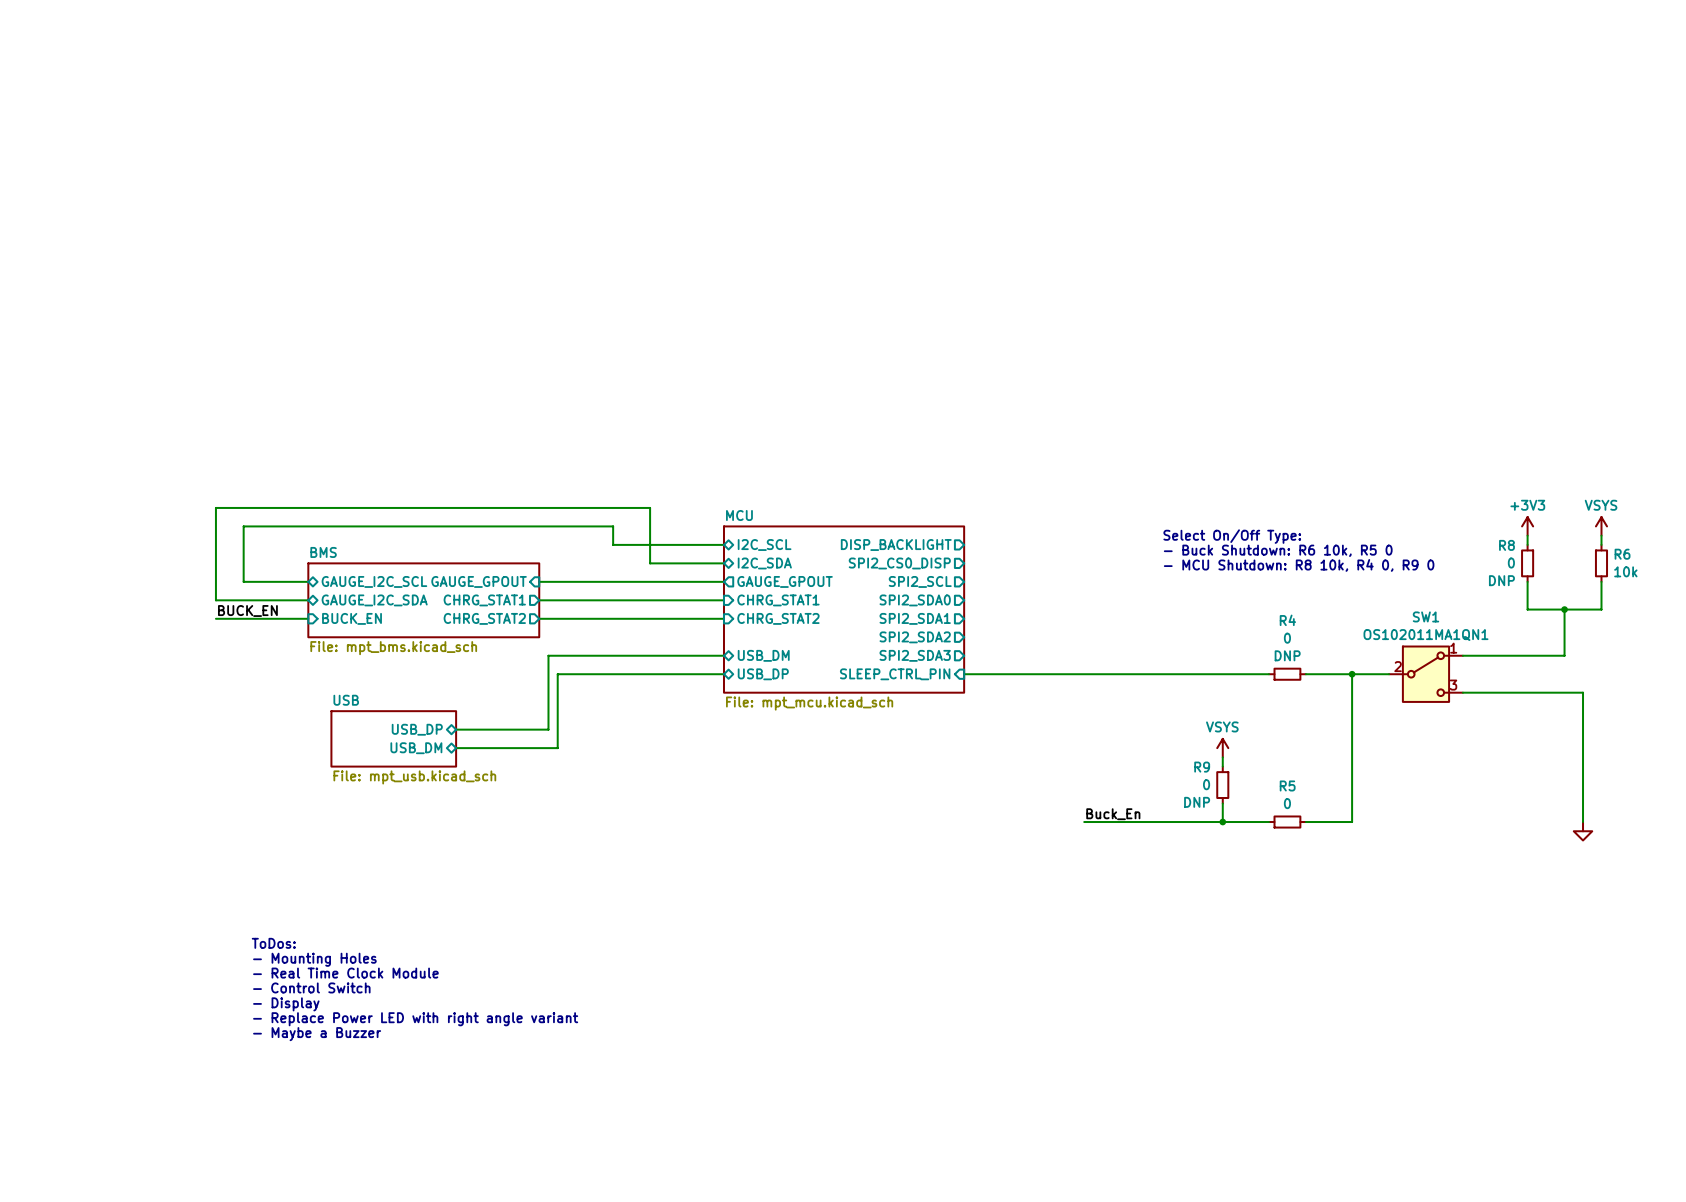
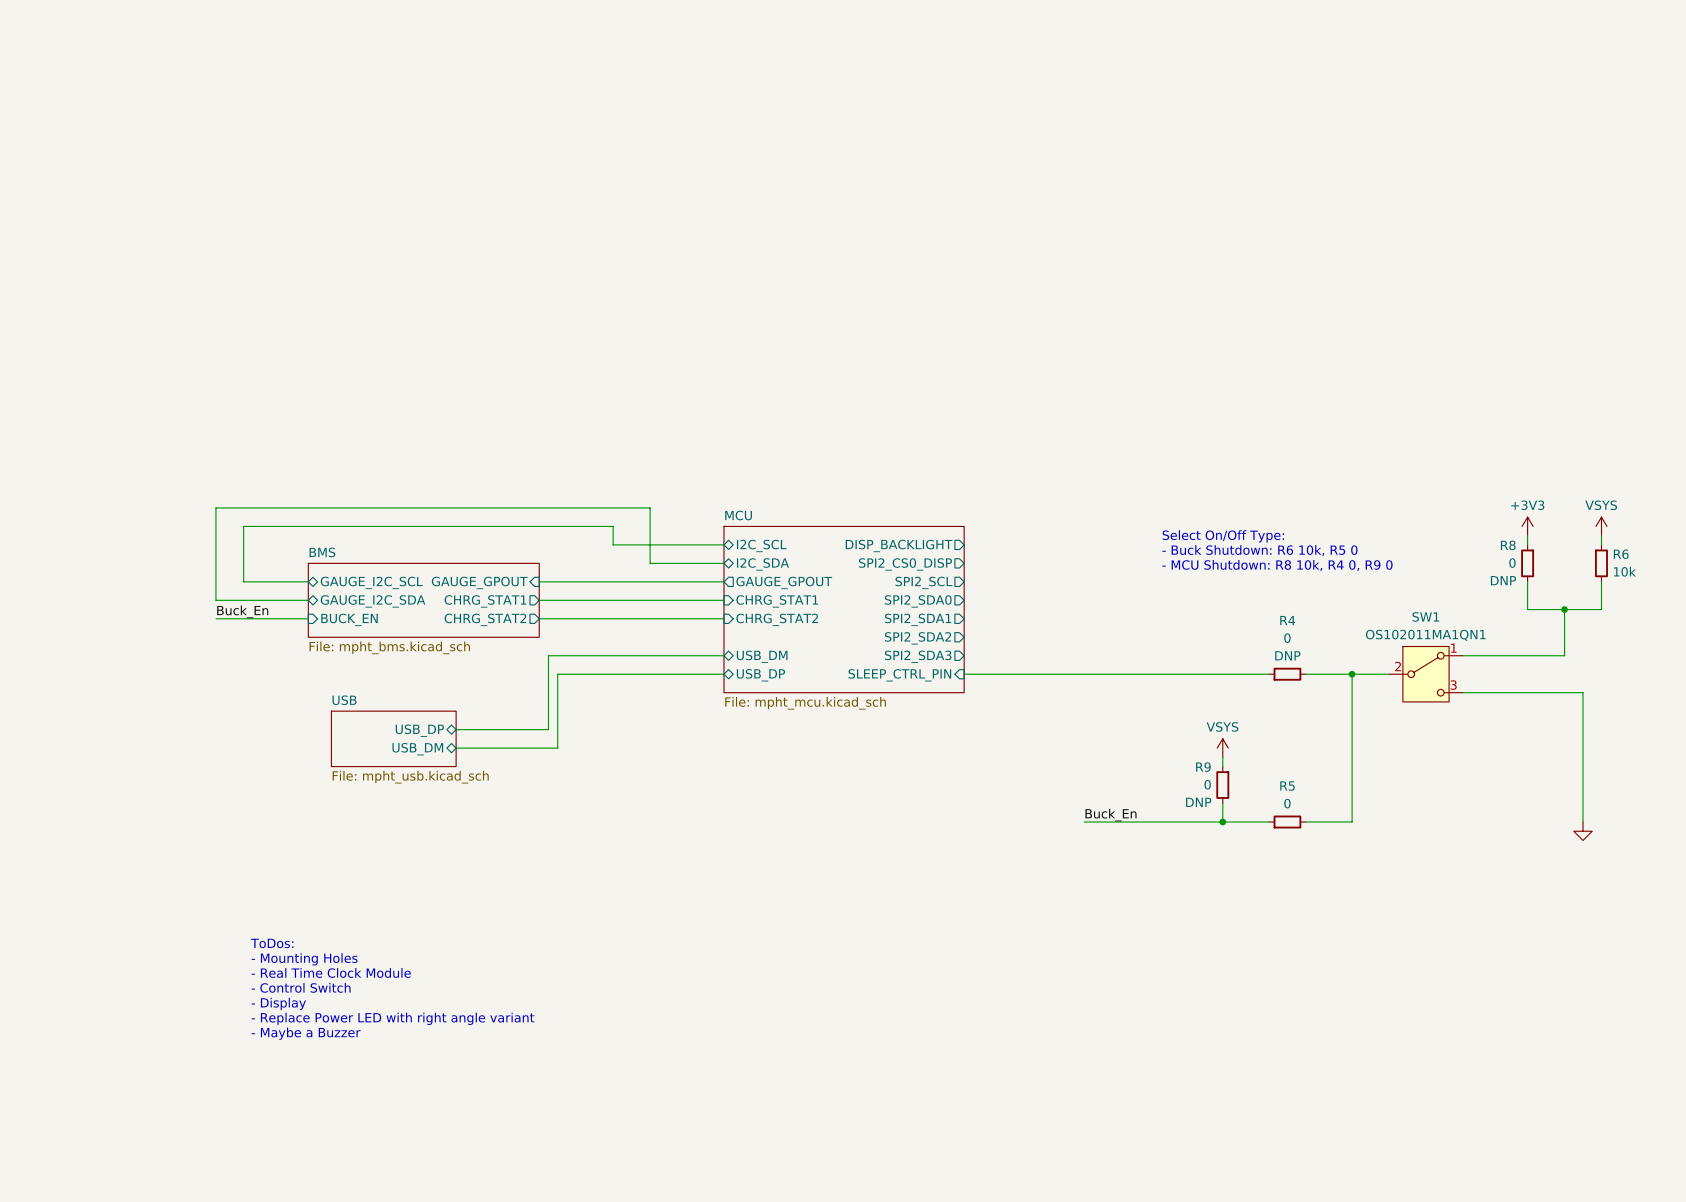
label: BUCK_EN (247, 610) -> Buck_En (242, 611)
sheet BMS value: File: mpt_bms.kicad_sch (393, 648) -> File: mpht_bms.kicad_sch (389, 647)
sheet MCU value: File: mpt_mcu.kicad_sch (809, 703) -> File: mpht_mcu.kicad_sch (805, 703)
sheet USB value: File: mpt_usb.kicad_sch (414, 777) -> File: mpht_usb.kicad_sch (410, 777)

